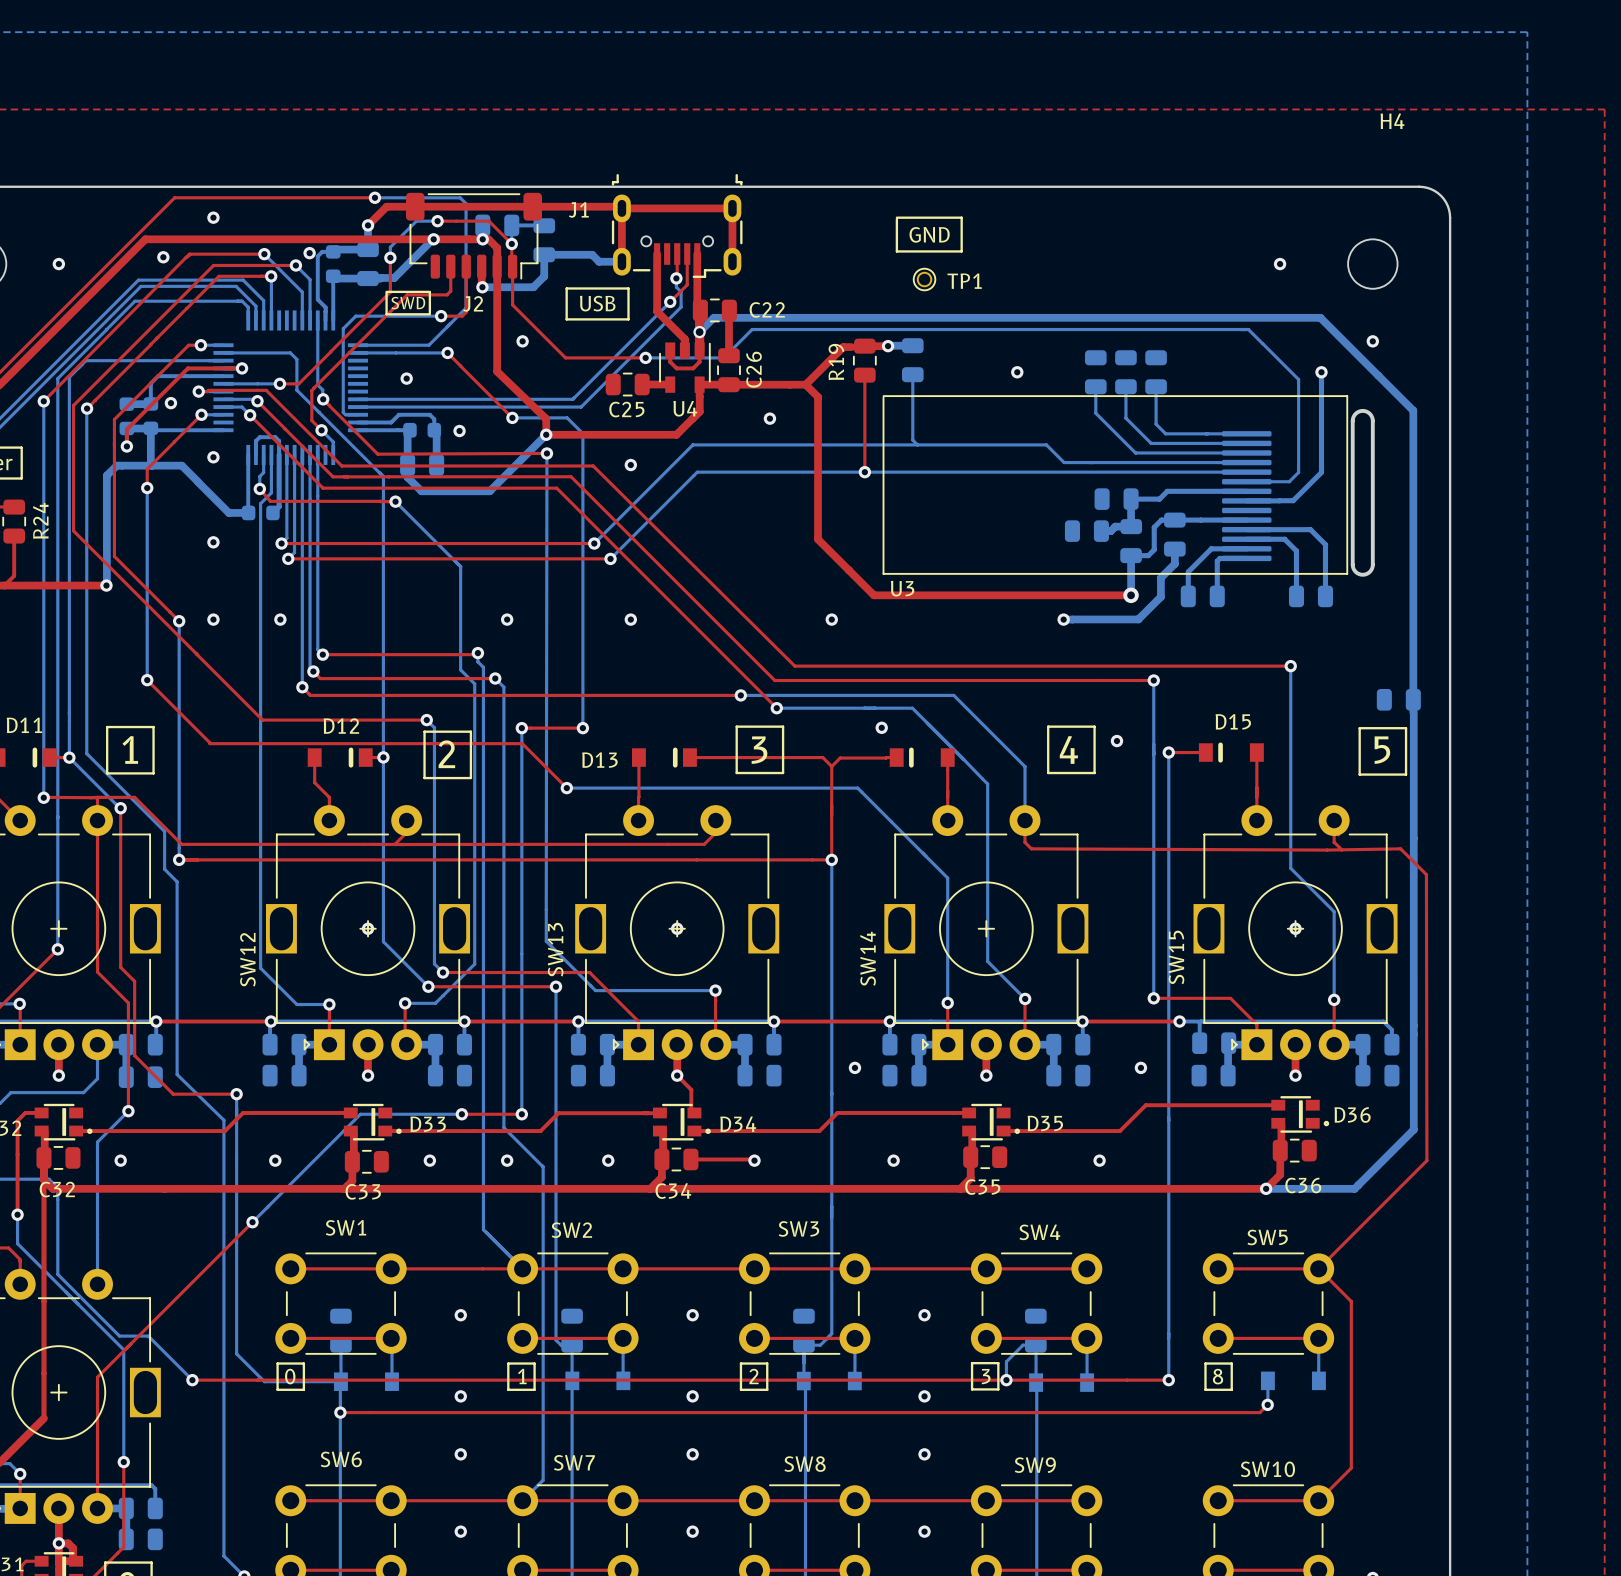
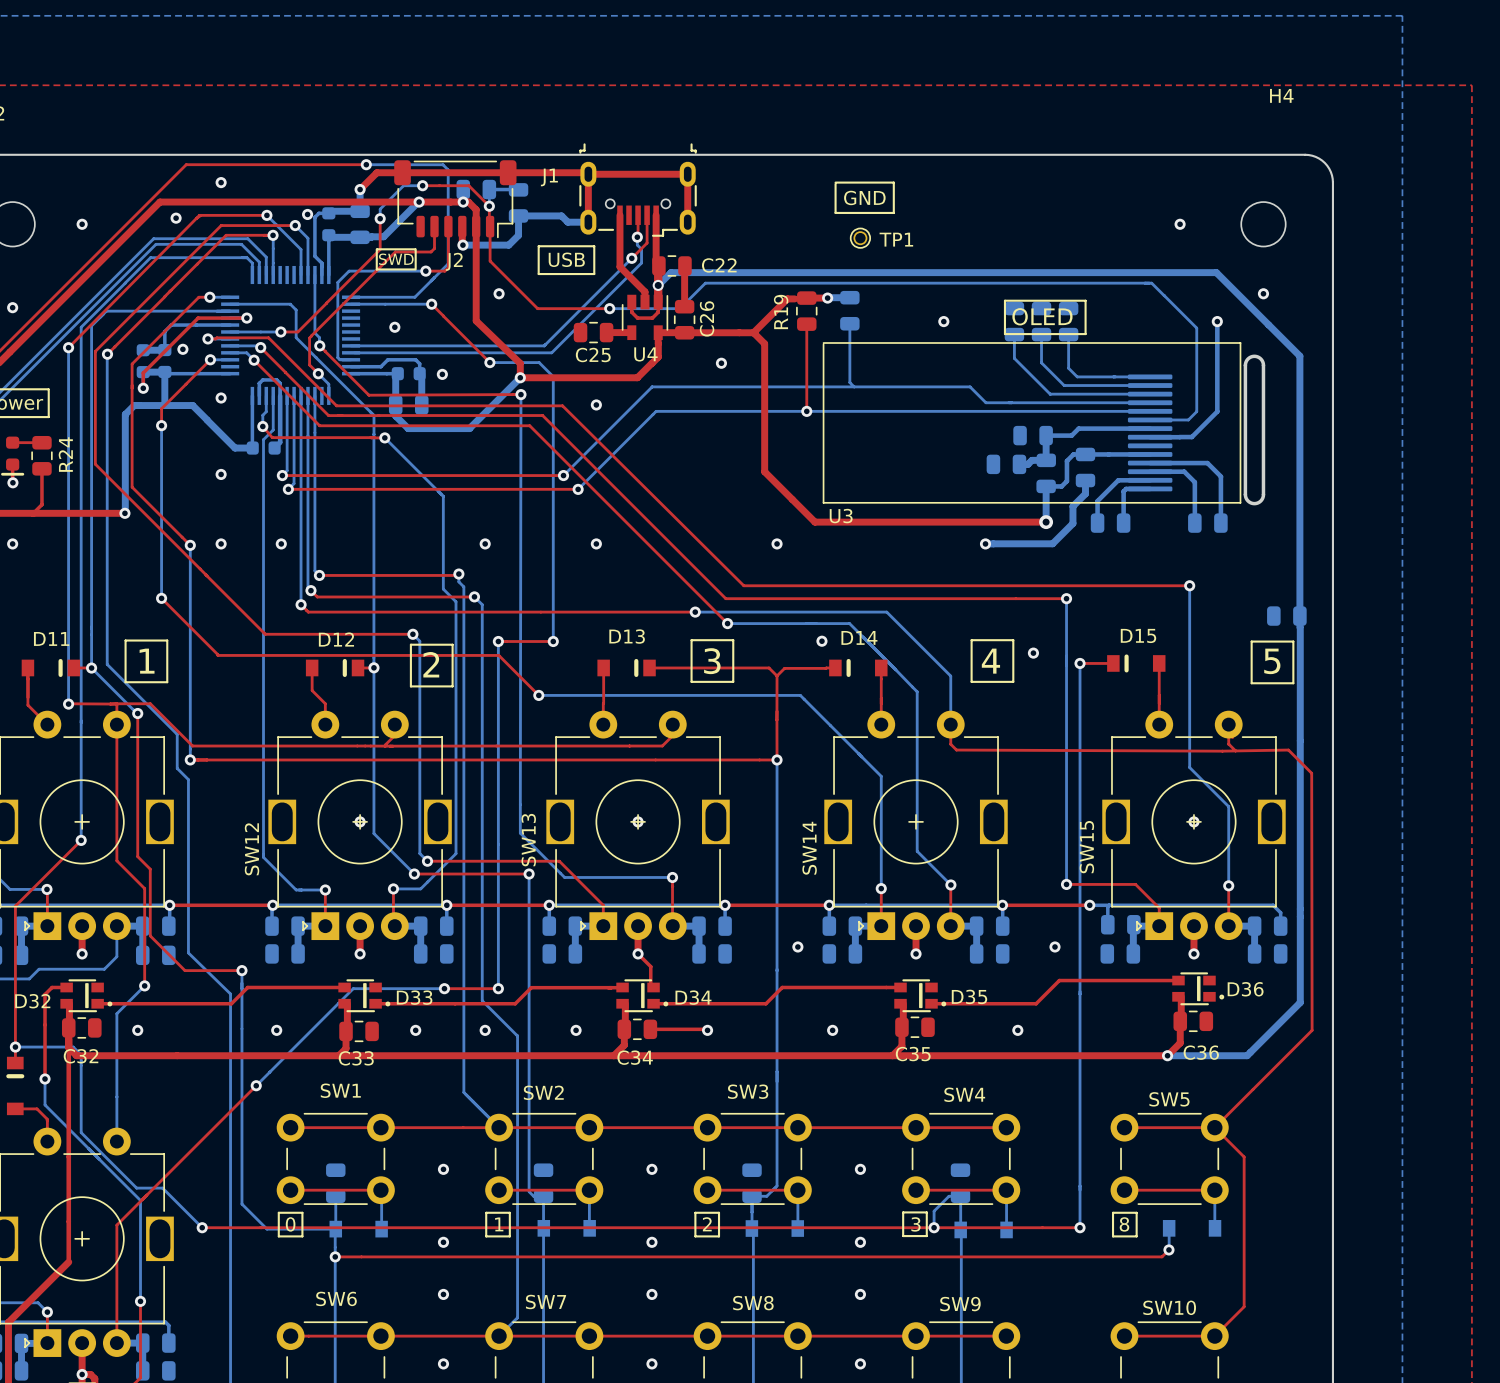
line: none -> (1004, 300) (1004, 334) (1085, 334) (1085, 300) (1004, 300)
text: none -> OLED (1042, 316)
D14 name: none -> D14 (859, 637)
D13 name position: D13 (599, 760) -> D13 (627, 636)

